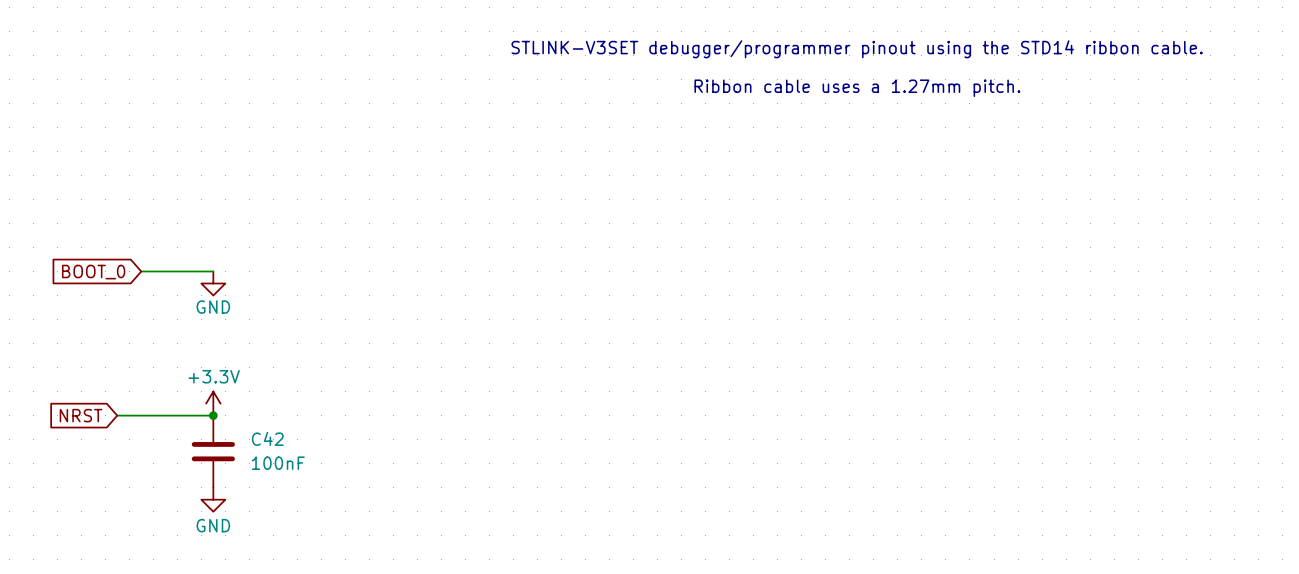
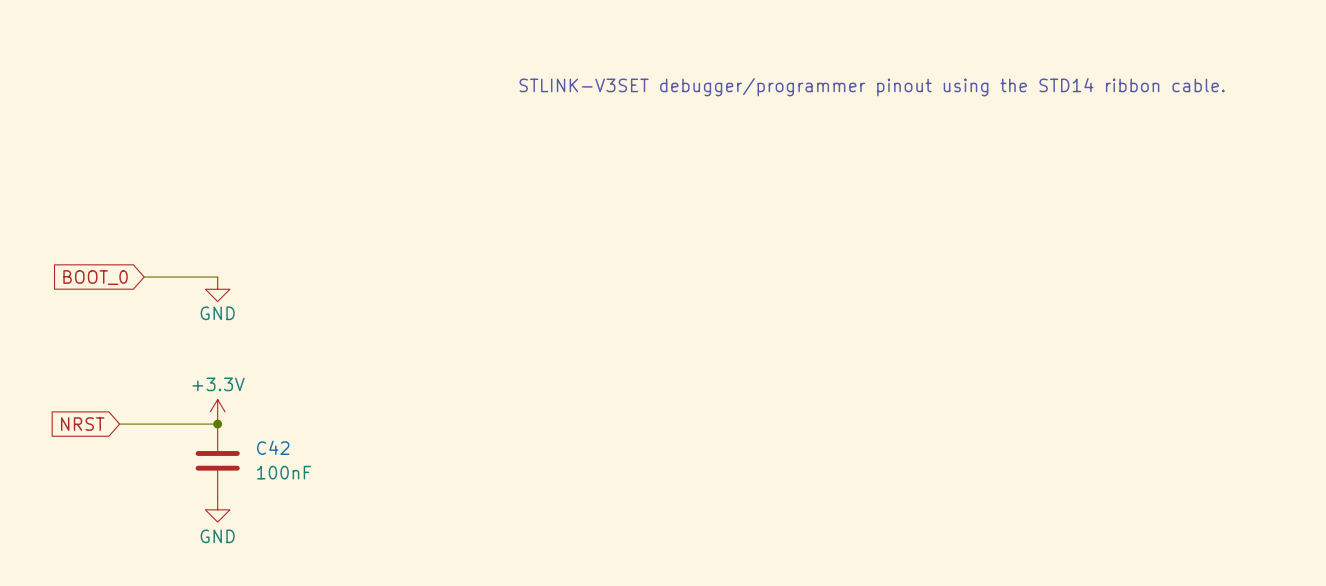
text position: STLINK-V3SET debugger/programmer pinout using the STD14 ribbon cable. (857, 49) -> STLINK-V3SET debugger/programmer pinout using the STD14 ribbon cable. (872, 87)
text: Ribbon cable uses a 1.27mm pitch. (857, 88) -> none

